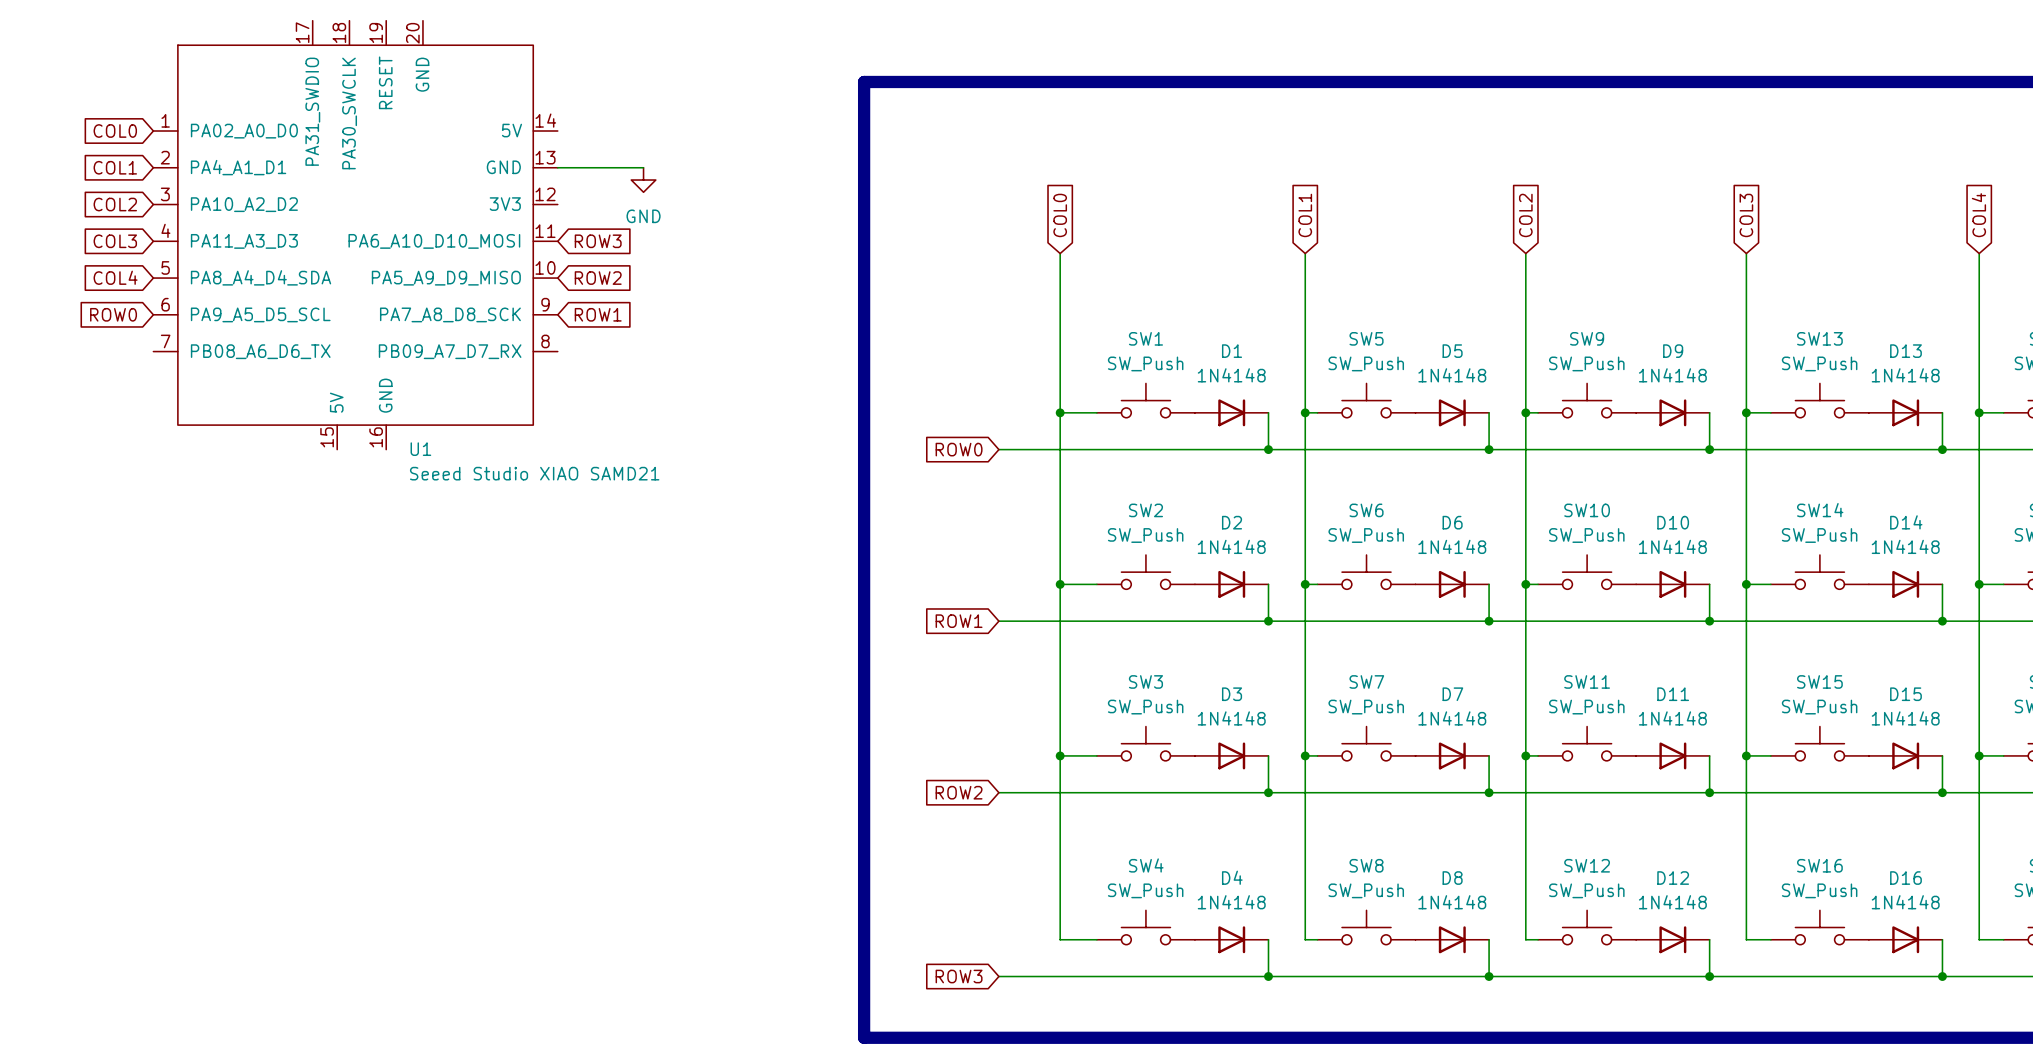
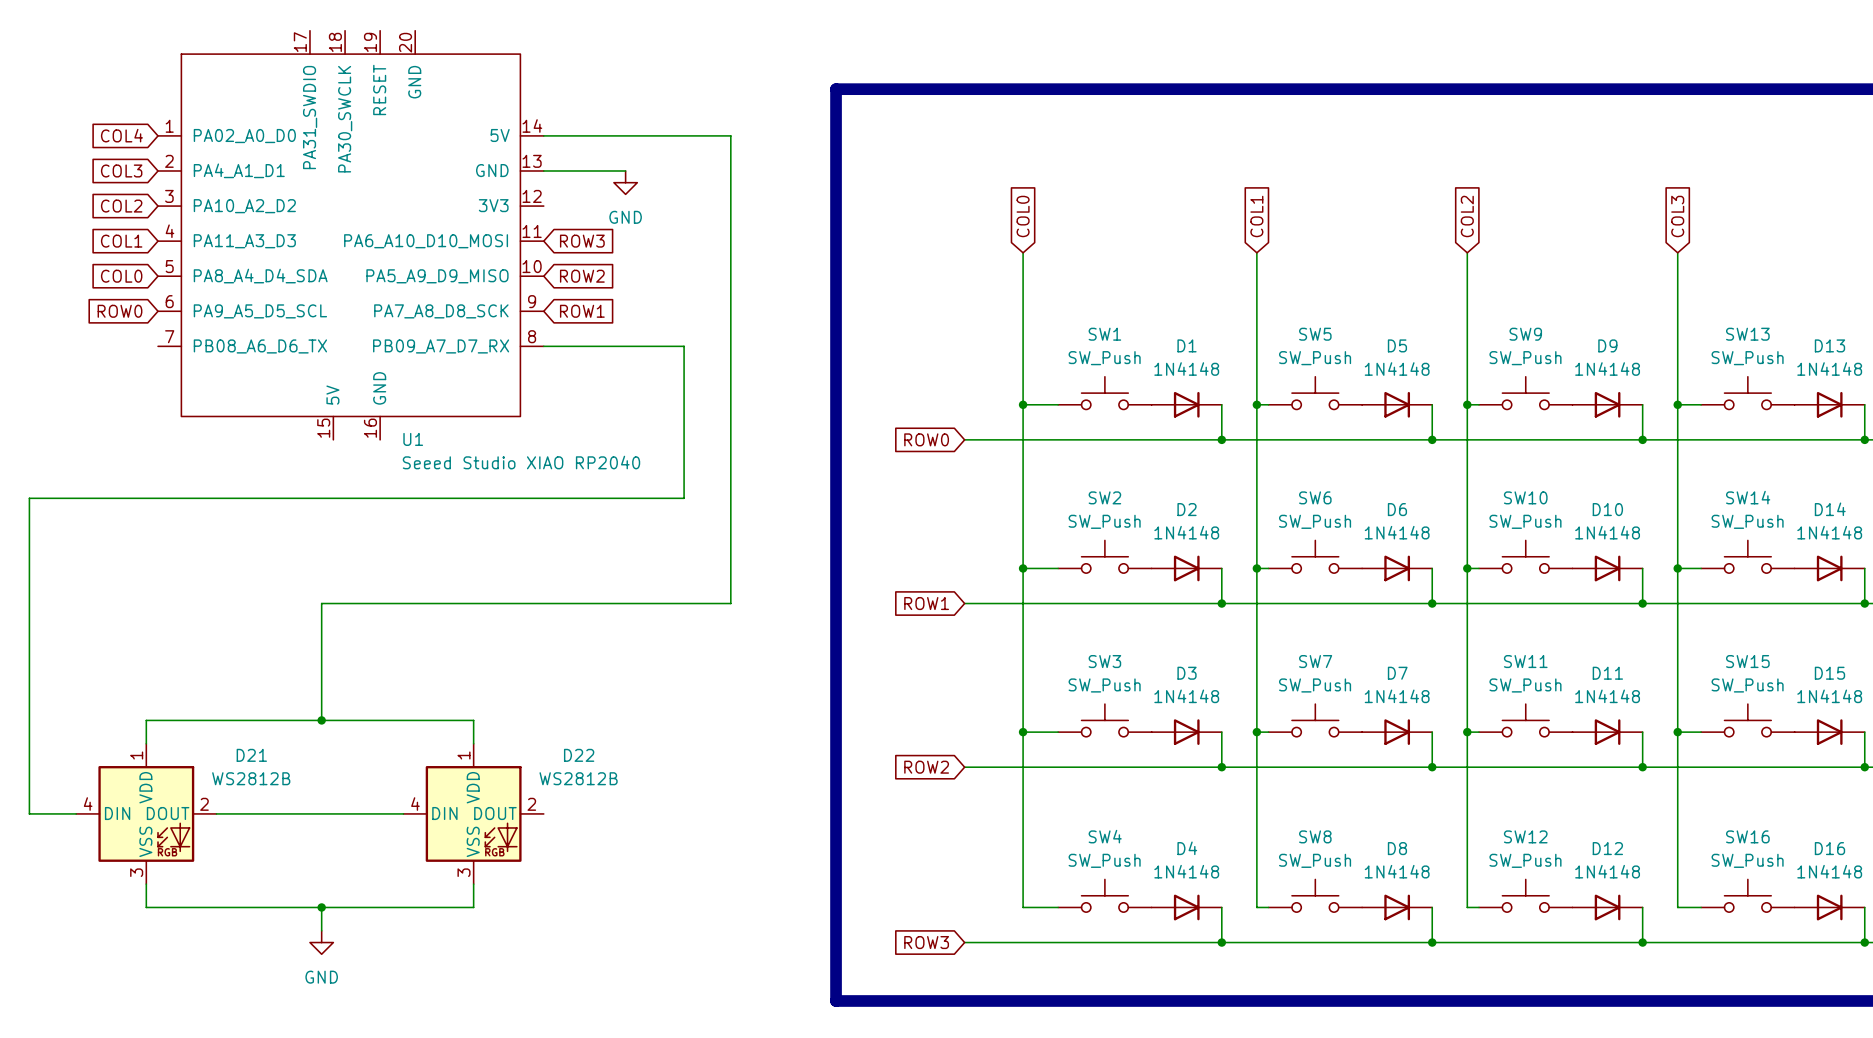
global label: COL0 (115, 131) -> COL4 (121, 135)
wire: none -> (543, 135) (730, 135) (730, 603) (321, 603) (321, 720)
global label: COL1 (115, 167) -> COL3 (121, 170)
global label: COL3 (115, 241) -> COL1 (121, 241)
global label: COL4 (115, 277) -> COL0 (121, 276)
wire: none -> (543, 346) (684, 346) (684, 498) (29, 498) (29, 813) (76, 813)
U1 value: Seeed Studio XIAO SAMD21 (534, 473) -> Seeed Studio XIAO RP2040 (521, 462)
junction: none -> (321, 720)
wire: none -> (146, 743) (146, 720) (473, 720) (473, 743)
D21: none -> WS2812B (146, 813)
wire: none -> (216, 813) (403, 813)
D22: none -> WS2812B (473, 813)
wire: none -> (146, 884) (146, 907) (473, 907) (473, 884)
wire: none -> (321, 907) (321, 930)
junction: none -> (321, 907)
power symbol: none -> GND (321, 942)

